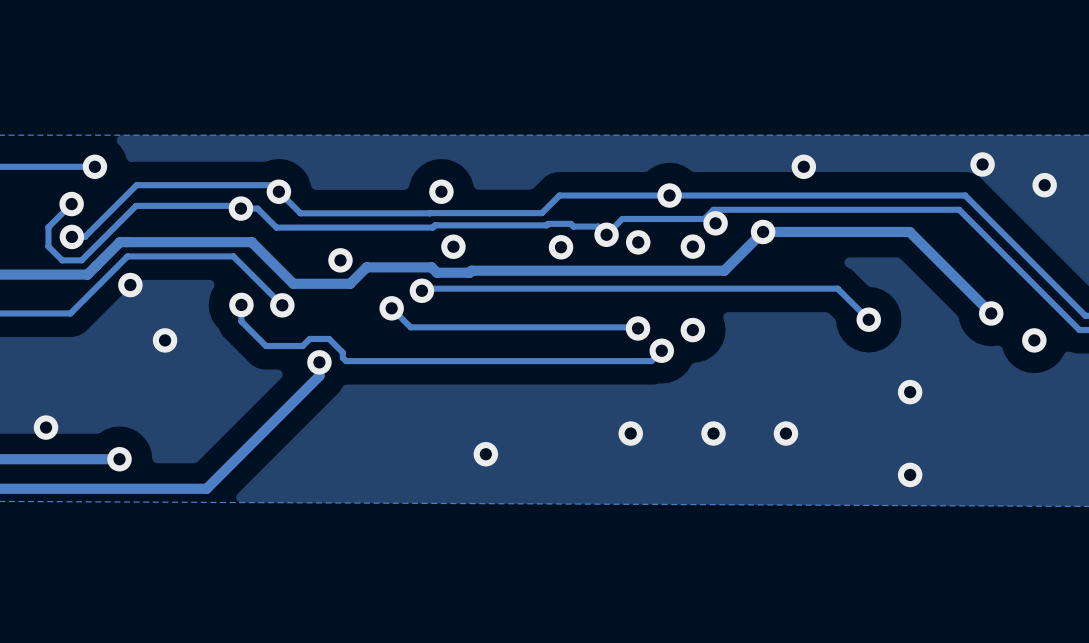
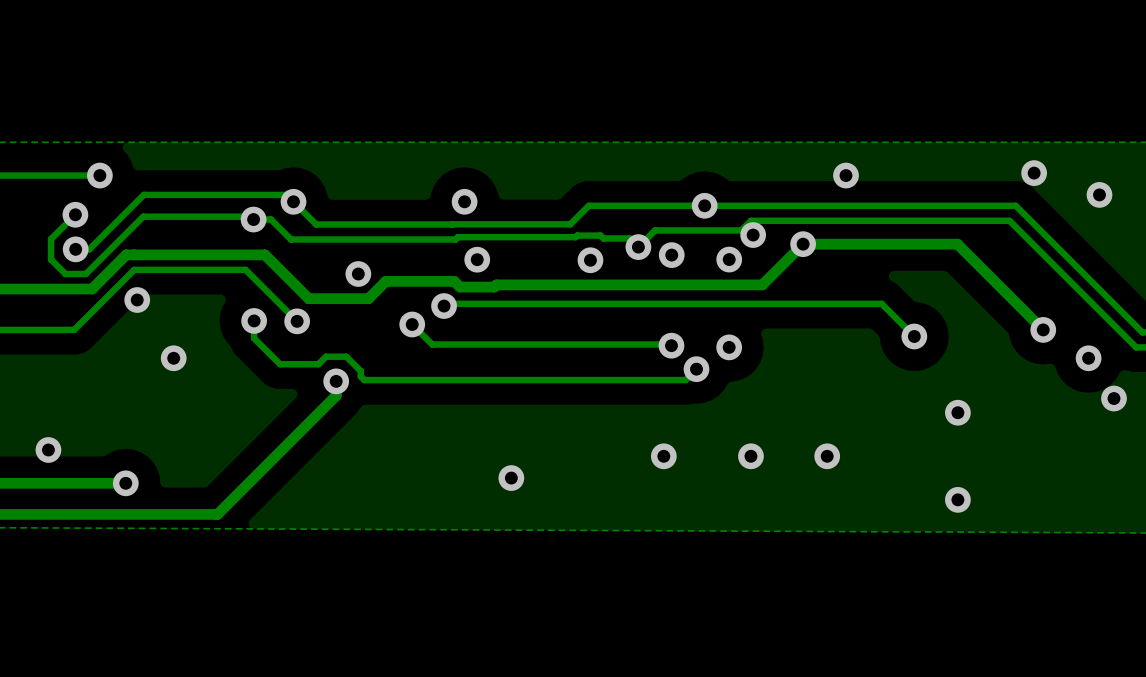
via: none -> (1114, 398)

